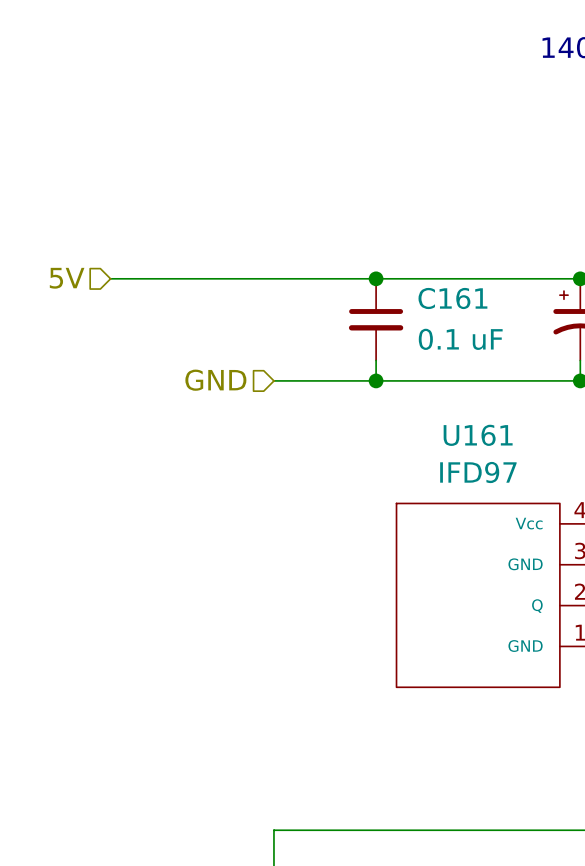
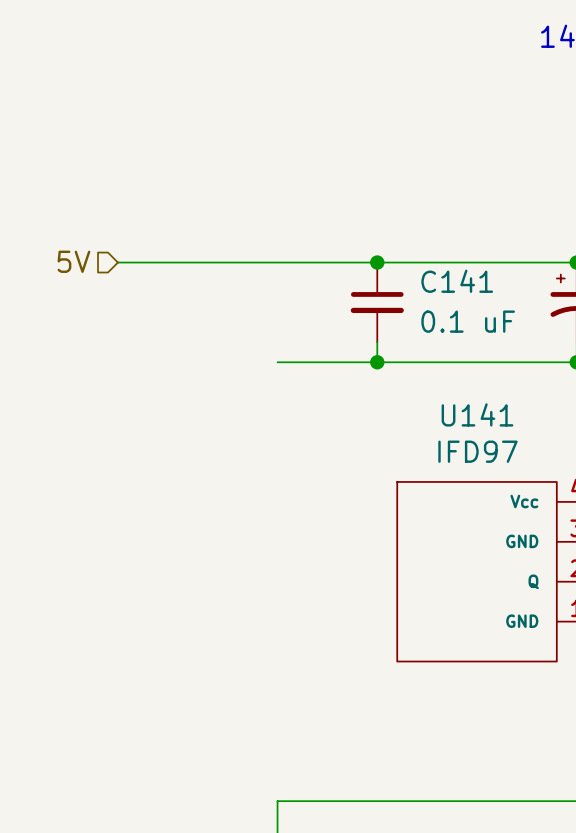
C161 name: C161 (452, 298) -> C141 (457, 281)
hierarchical label: GND (215, 380) -> none
U161 name: U161 (478, 435) -> U141 (477, 414)

